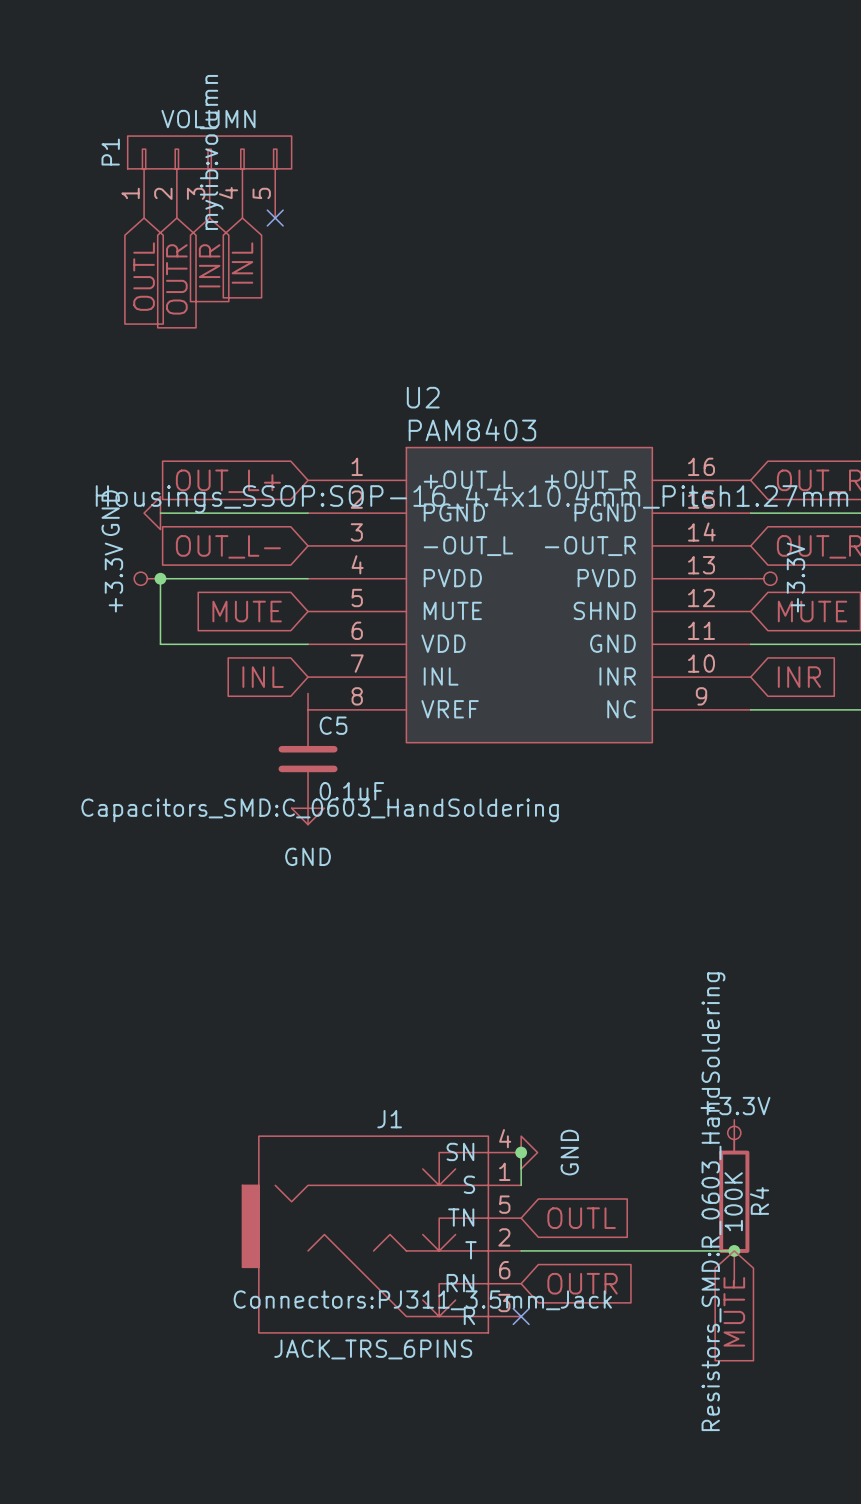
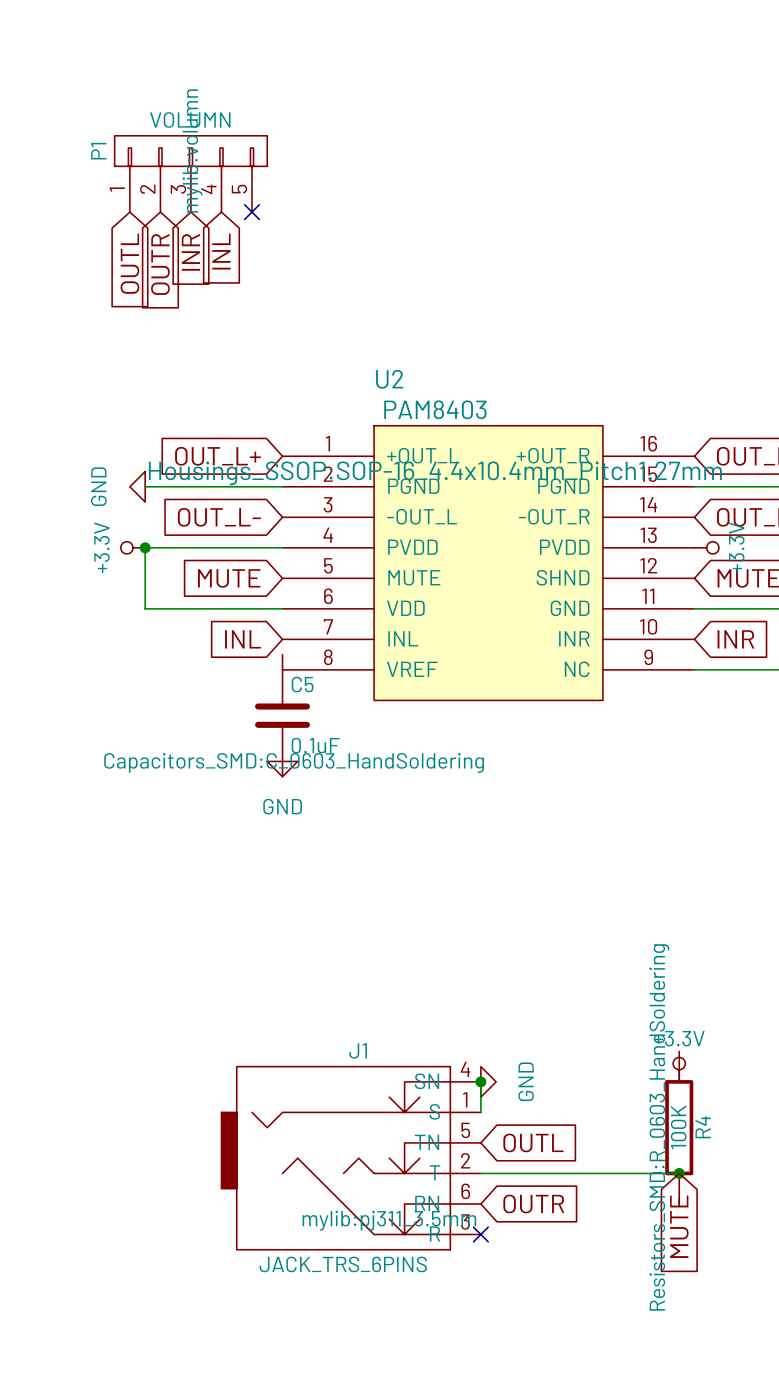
J1 text: Connectors:PJ311_3.5mm_Jack (422, 1300) -> mylib:pj311_3.5mm (389, 1220)

